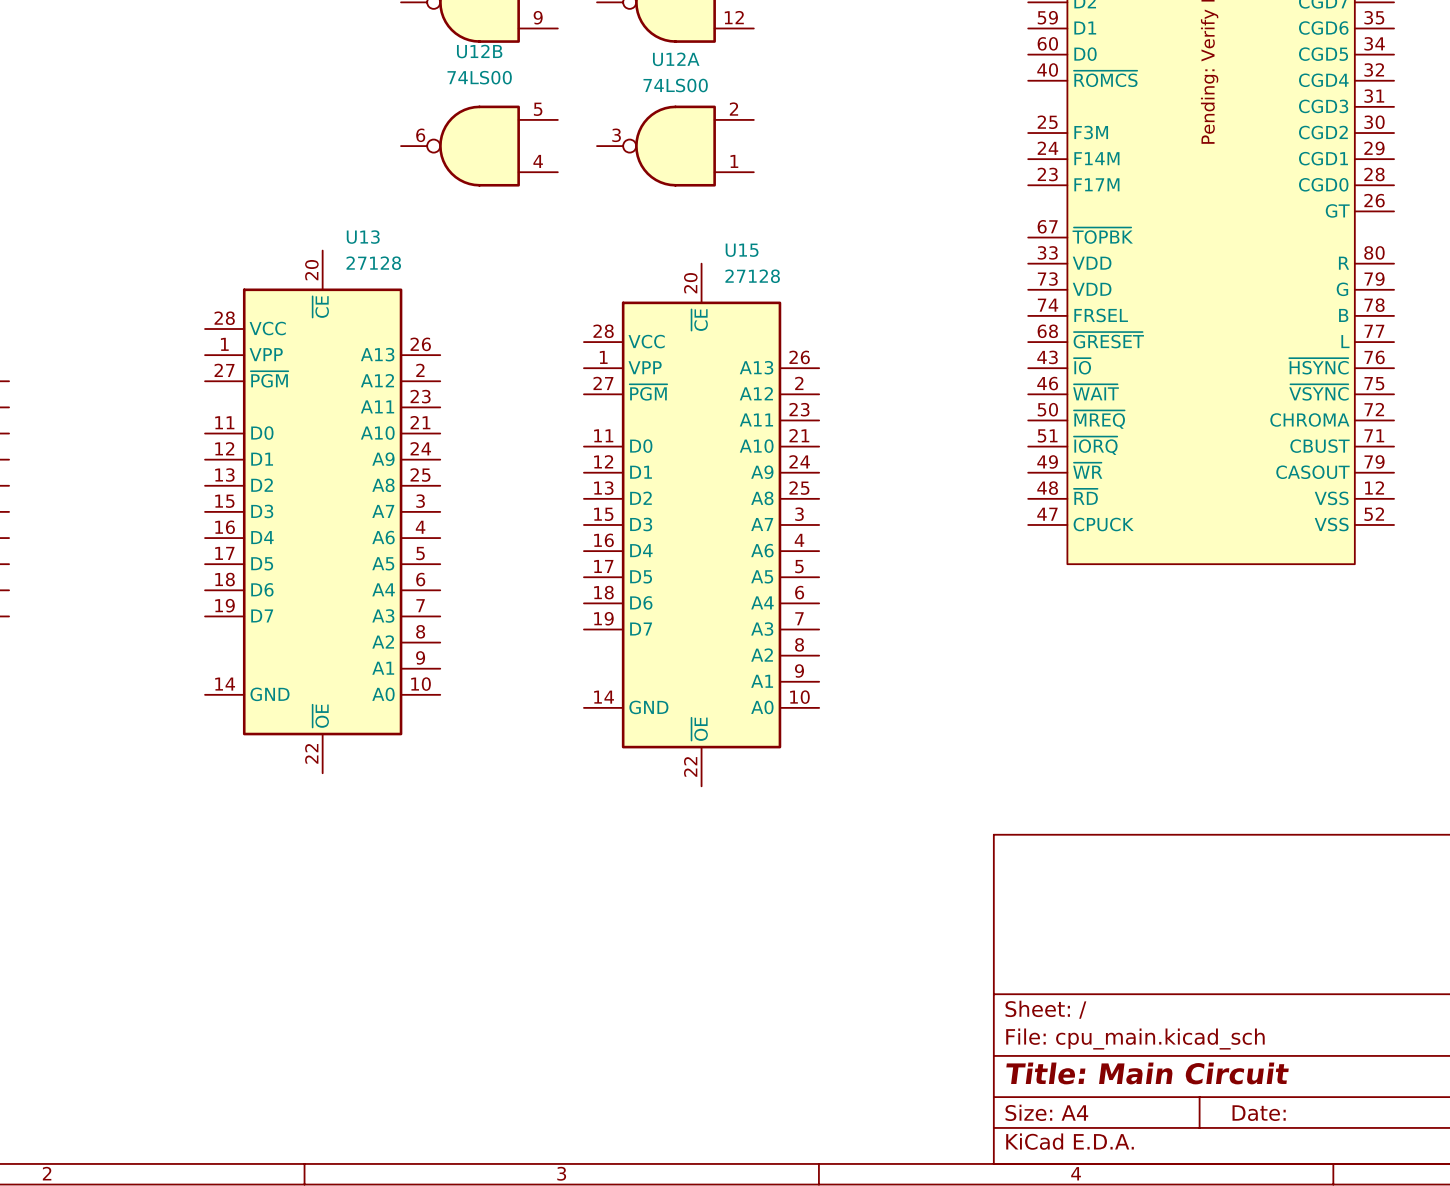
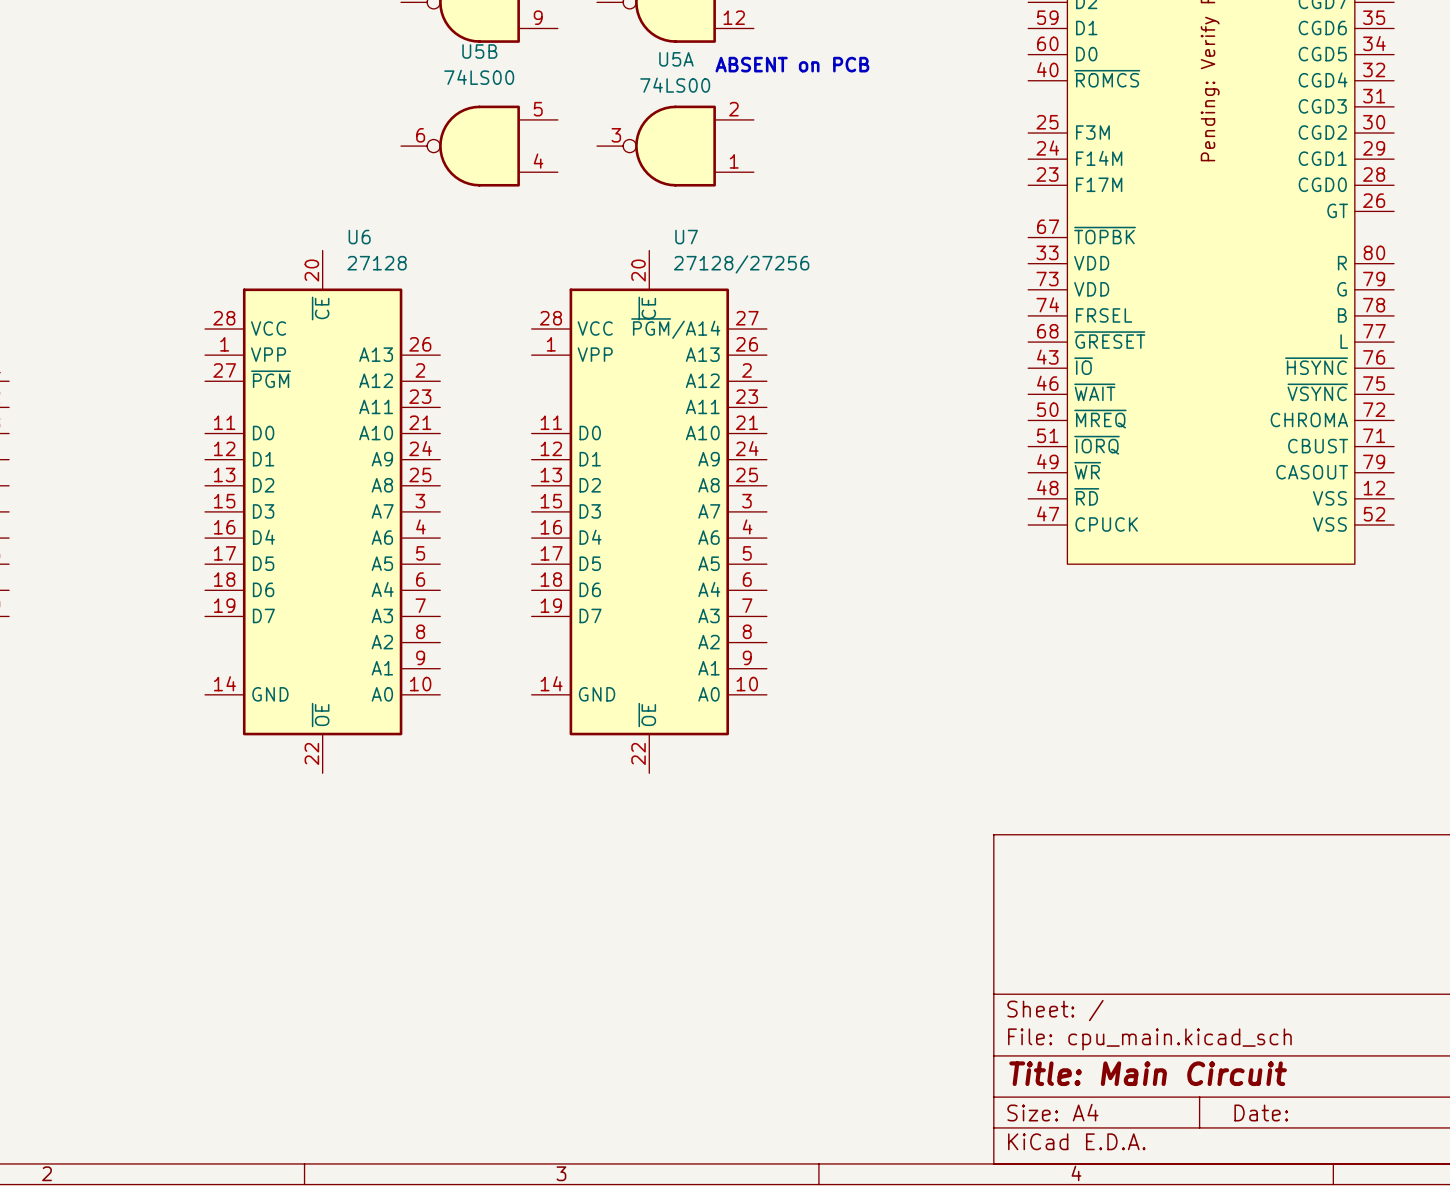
U12B name: U12B (479, 51) -> U5B (479, 51)
U12A name: U12A (676, 59) -> U5A (676, 59)
text: none -> ABSENT on PCB (792, 64)
U13 name: U13 (363, 237) -> U6 (359, 237)
U7: none -> 27128/27256 (649, 511)
U15: 27128 (701, 524) -> none

